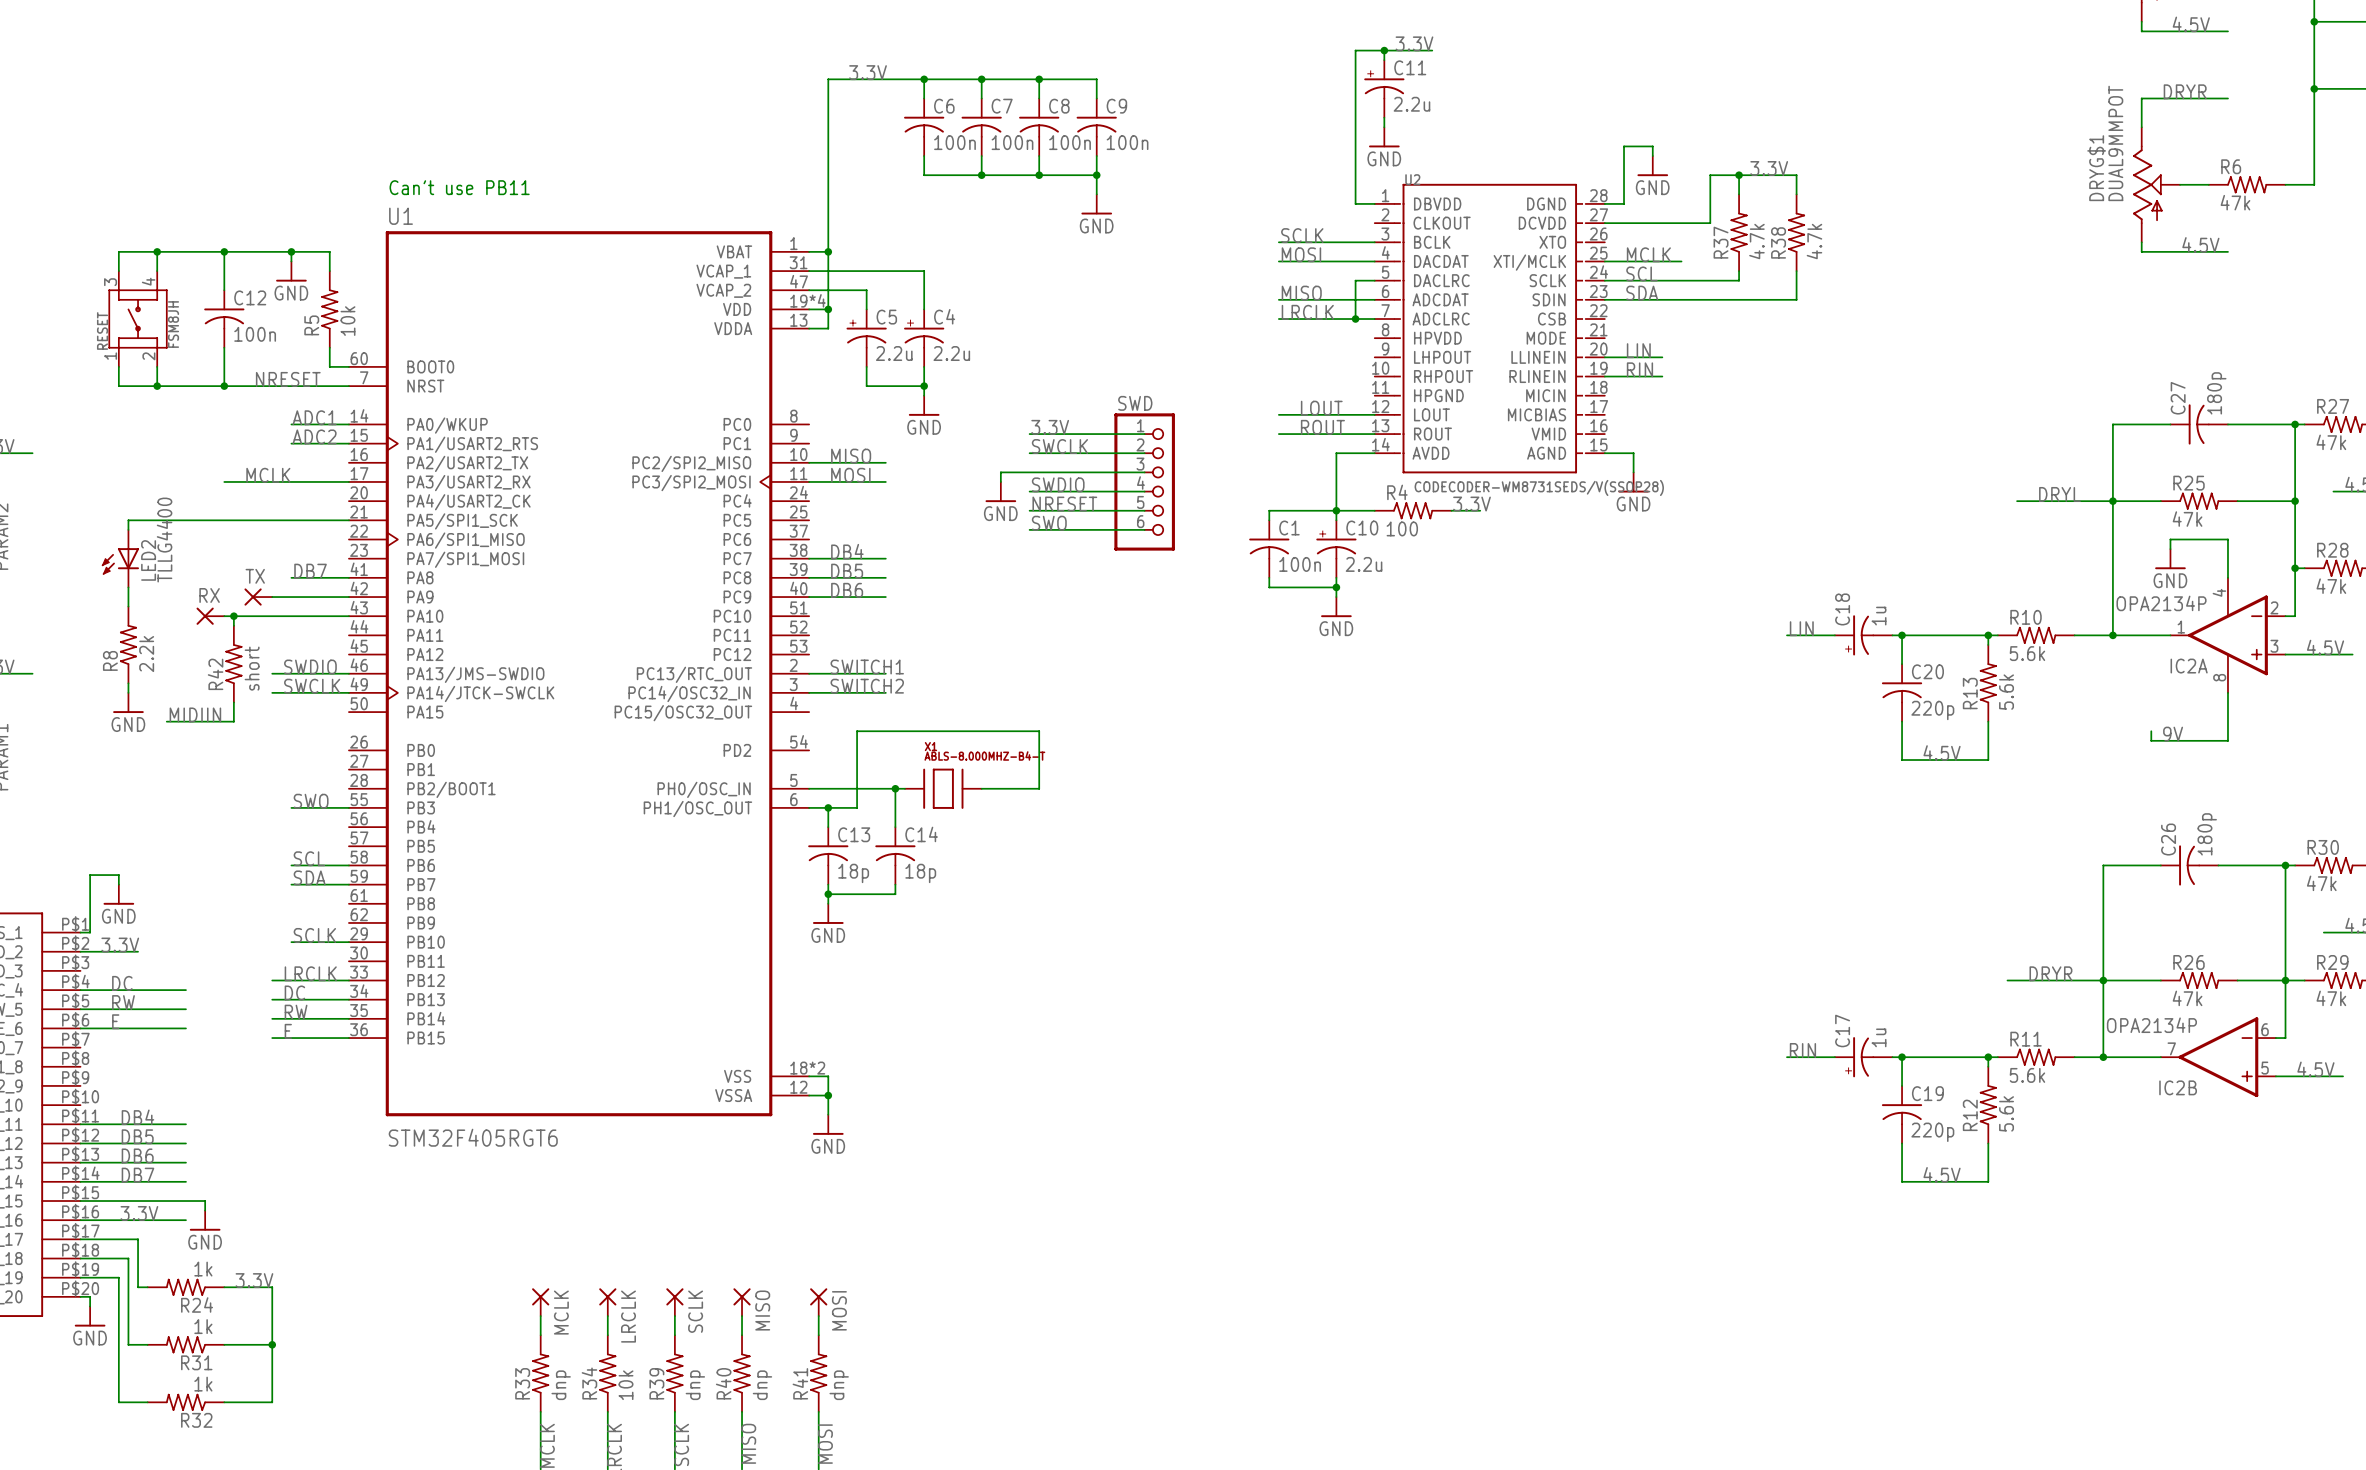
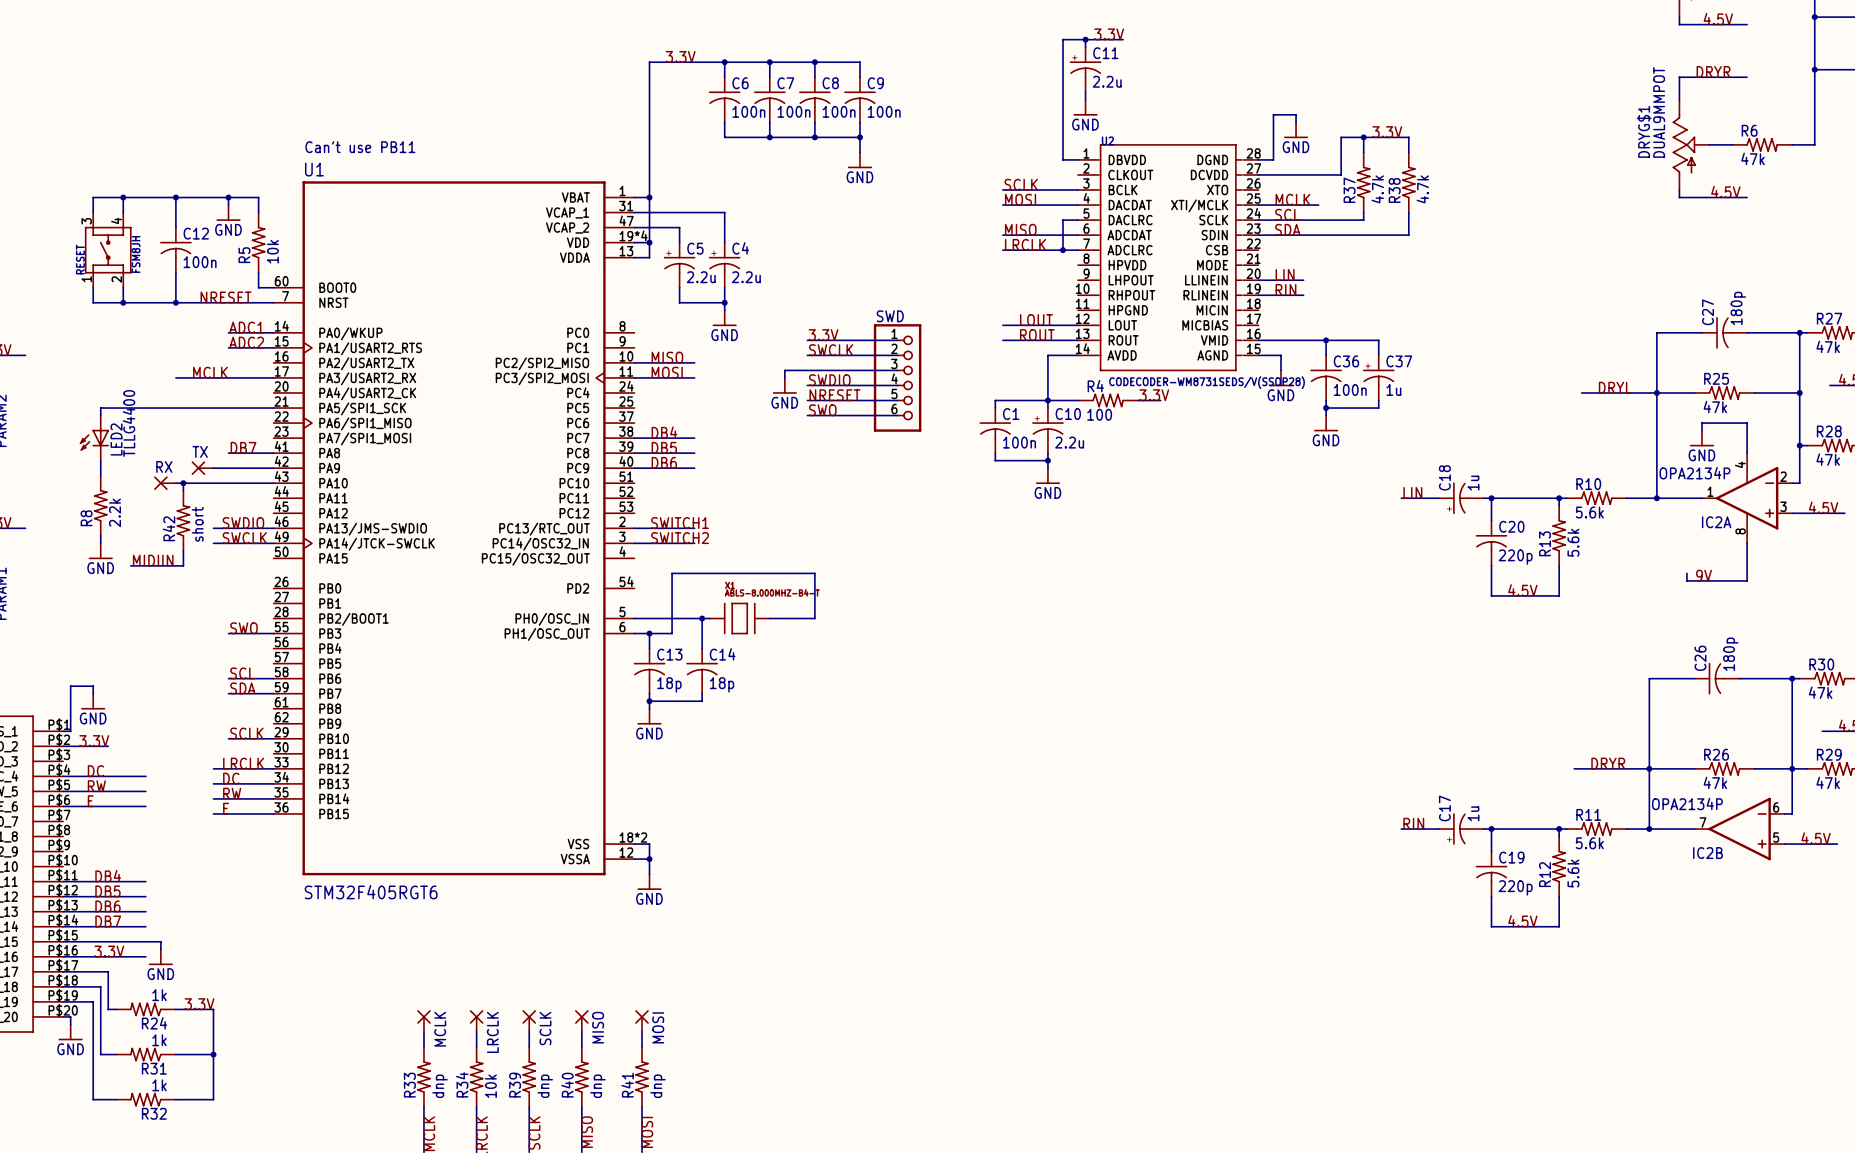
wire: none -> (1258, 340) (1378, 340) (1378, 355)
wire: none -> (1326, 340) (1326, 355)
junction: none -> (1326, 340)
C36: none -> 100n (1326, 377)
C37: none -> 1u (1378, 377)
wire: none -> (1326, 400) (1326, 415)
wire: none -> (1378, 400) (1378, 408) (1326, 408)
junction: none -> (1326, 408)
power symbol: none -> GND (1326, 423)

